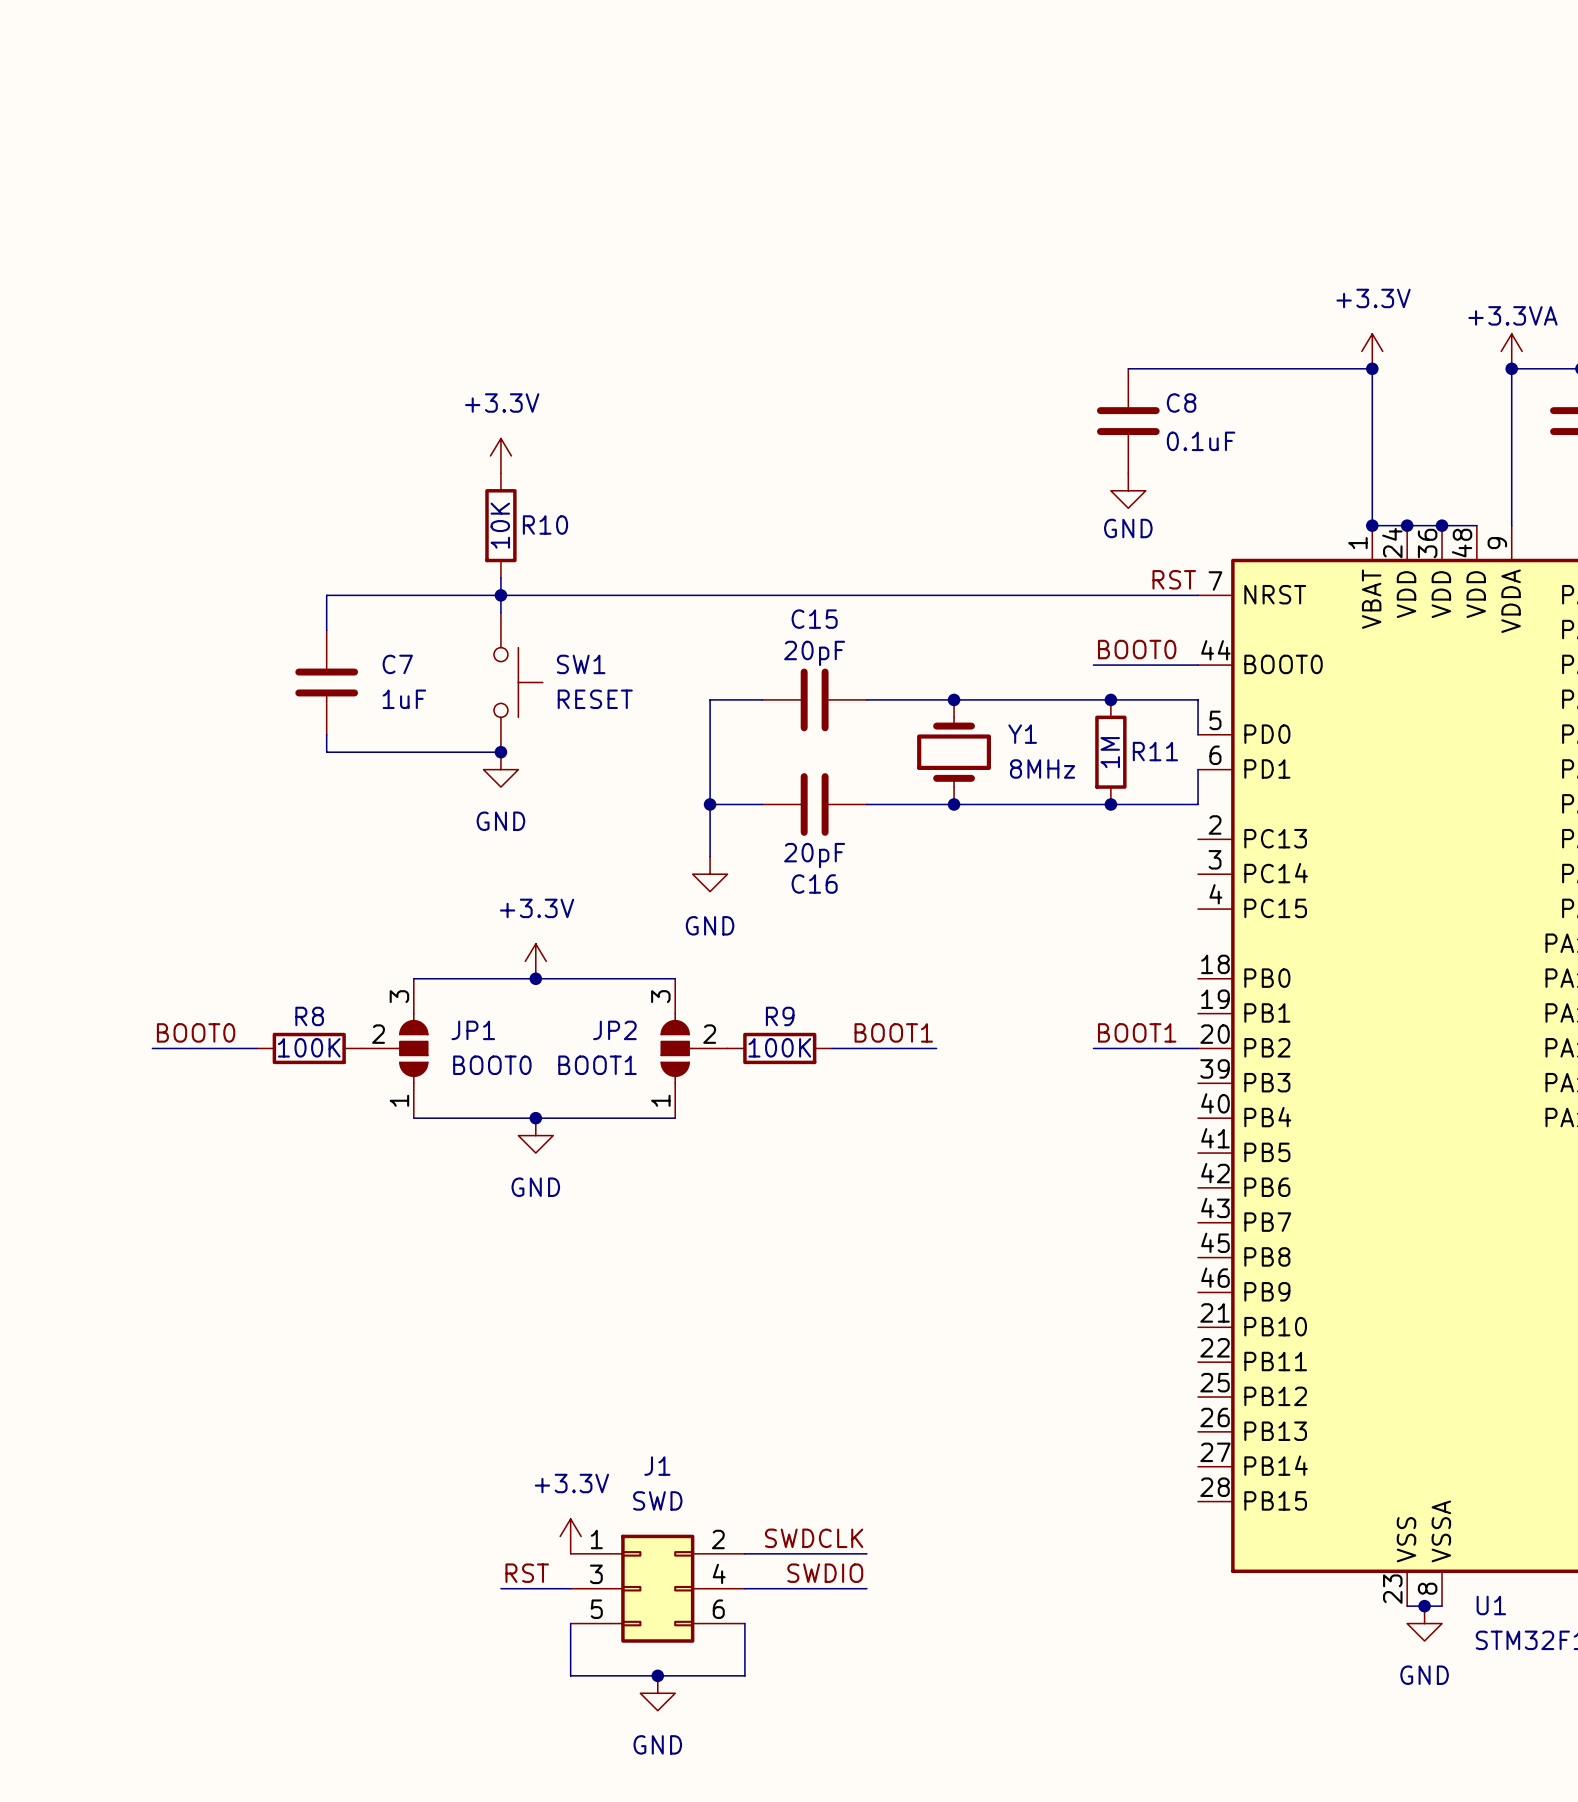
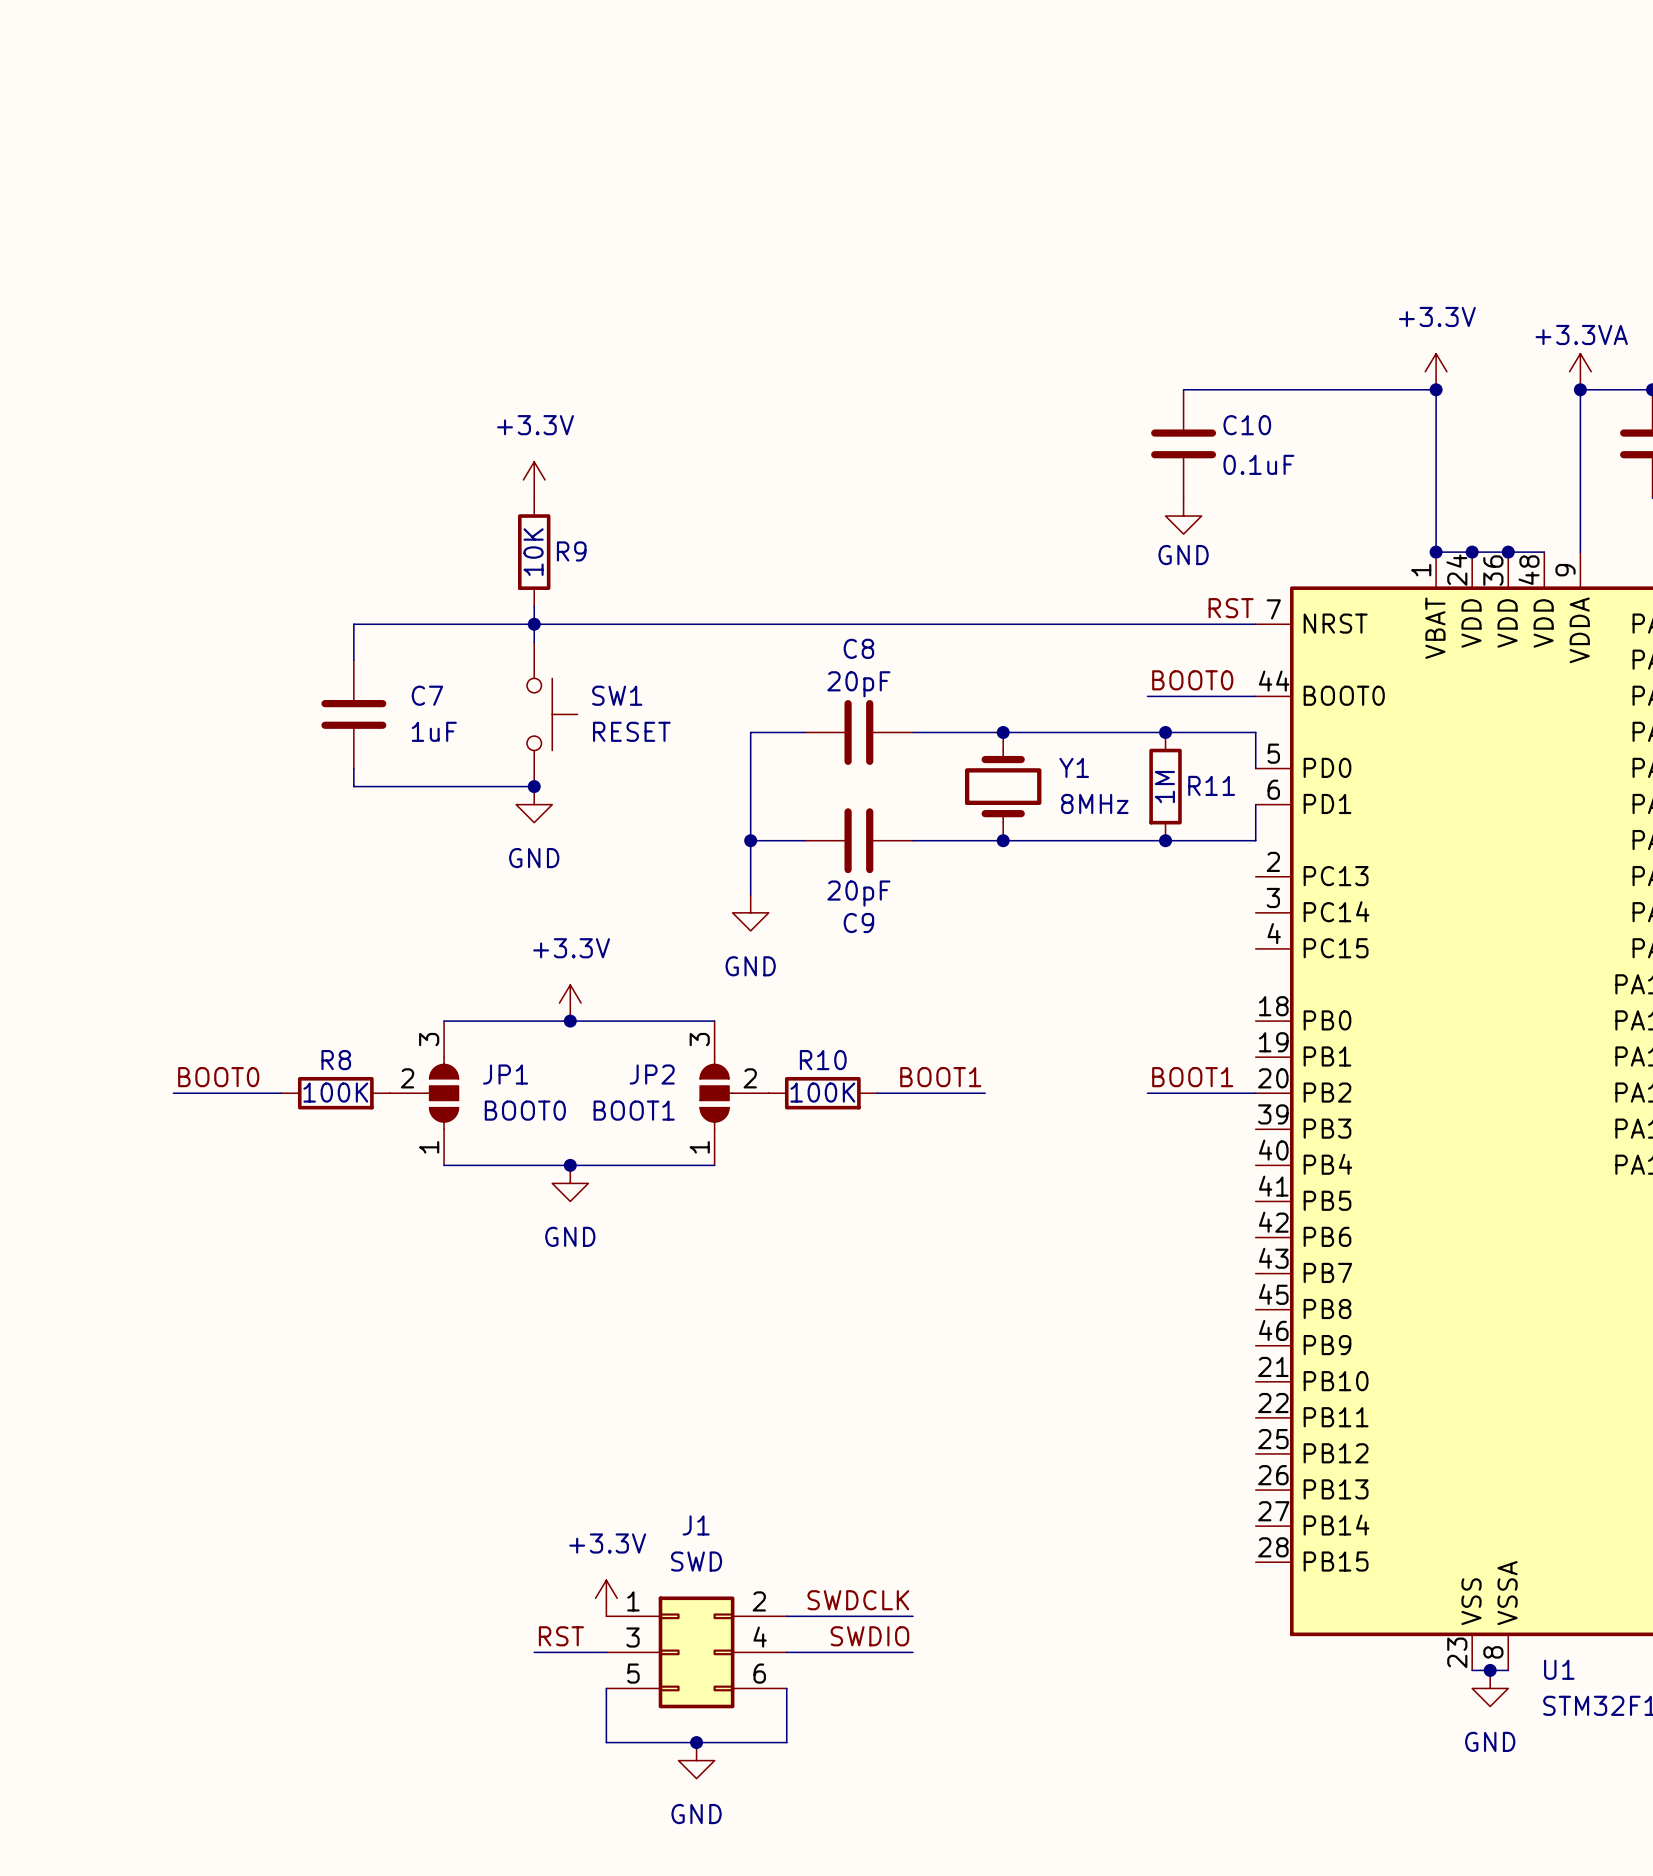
C8 name: C8 (1181, 403) -> C10 (1247, 425)
R10 name: R10 (545, 525) -> R9 (571, 551)
C15 name: C15 (814, 619) -> C8 (858, 648)
C16 name: C16 (814, 884) -> C9 (858, 923)
R9 name: R9 (780, 1016) -> R10 (823, 1060)

